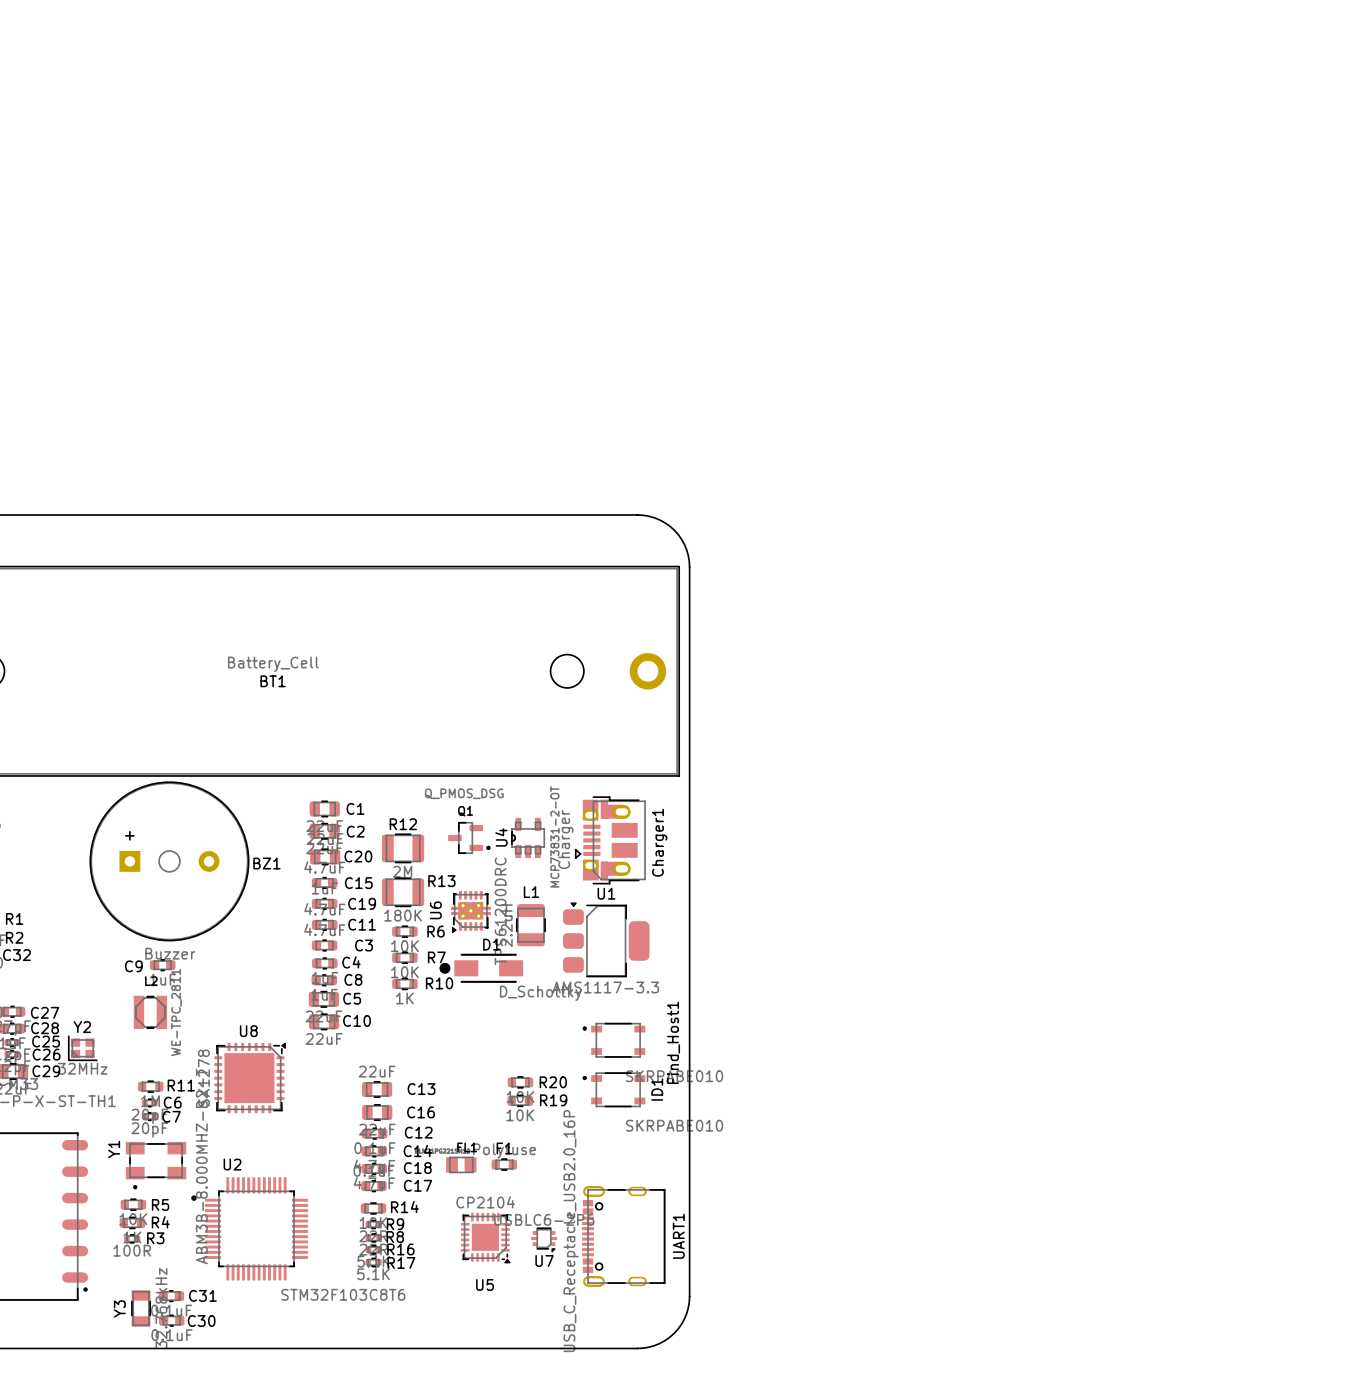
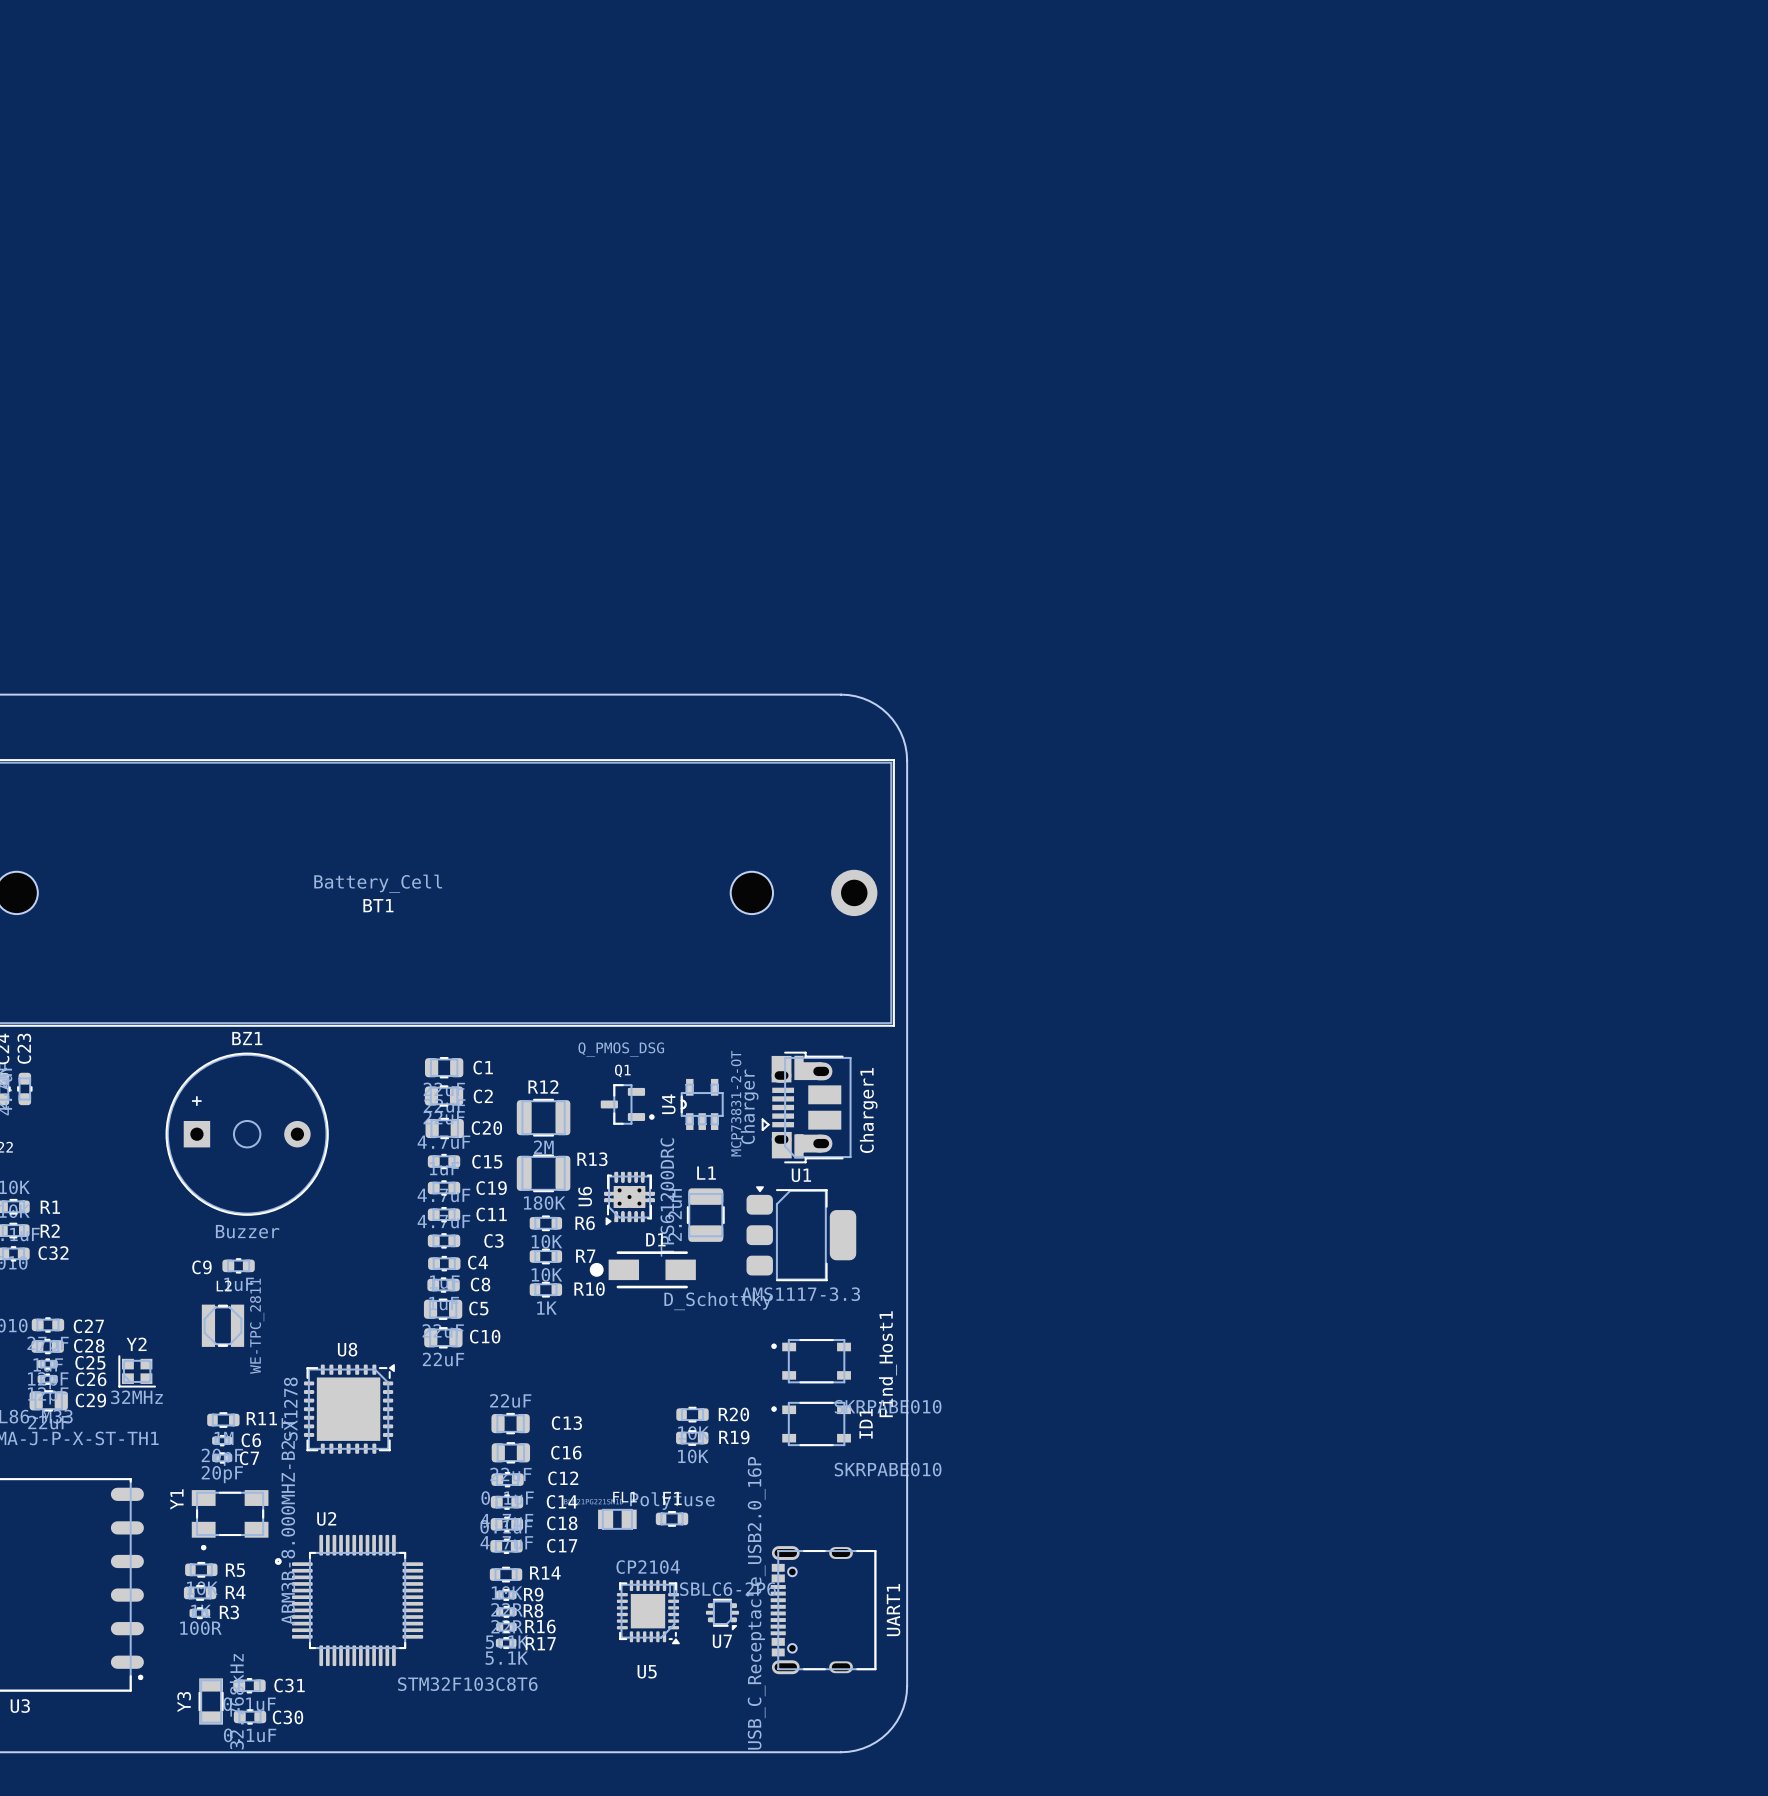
BZ1 footprint: [89, 781, 250, 942] -> [165, 1052, 329, 1216]
BZ1 name position: BZ1 (266, 863) -> BZ1 (247, 1038)

